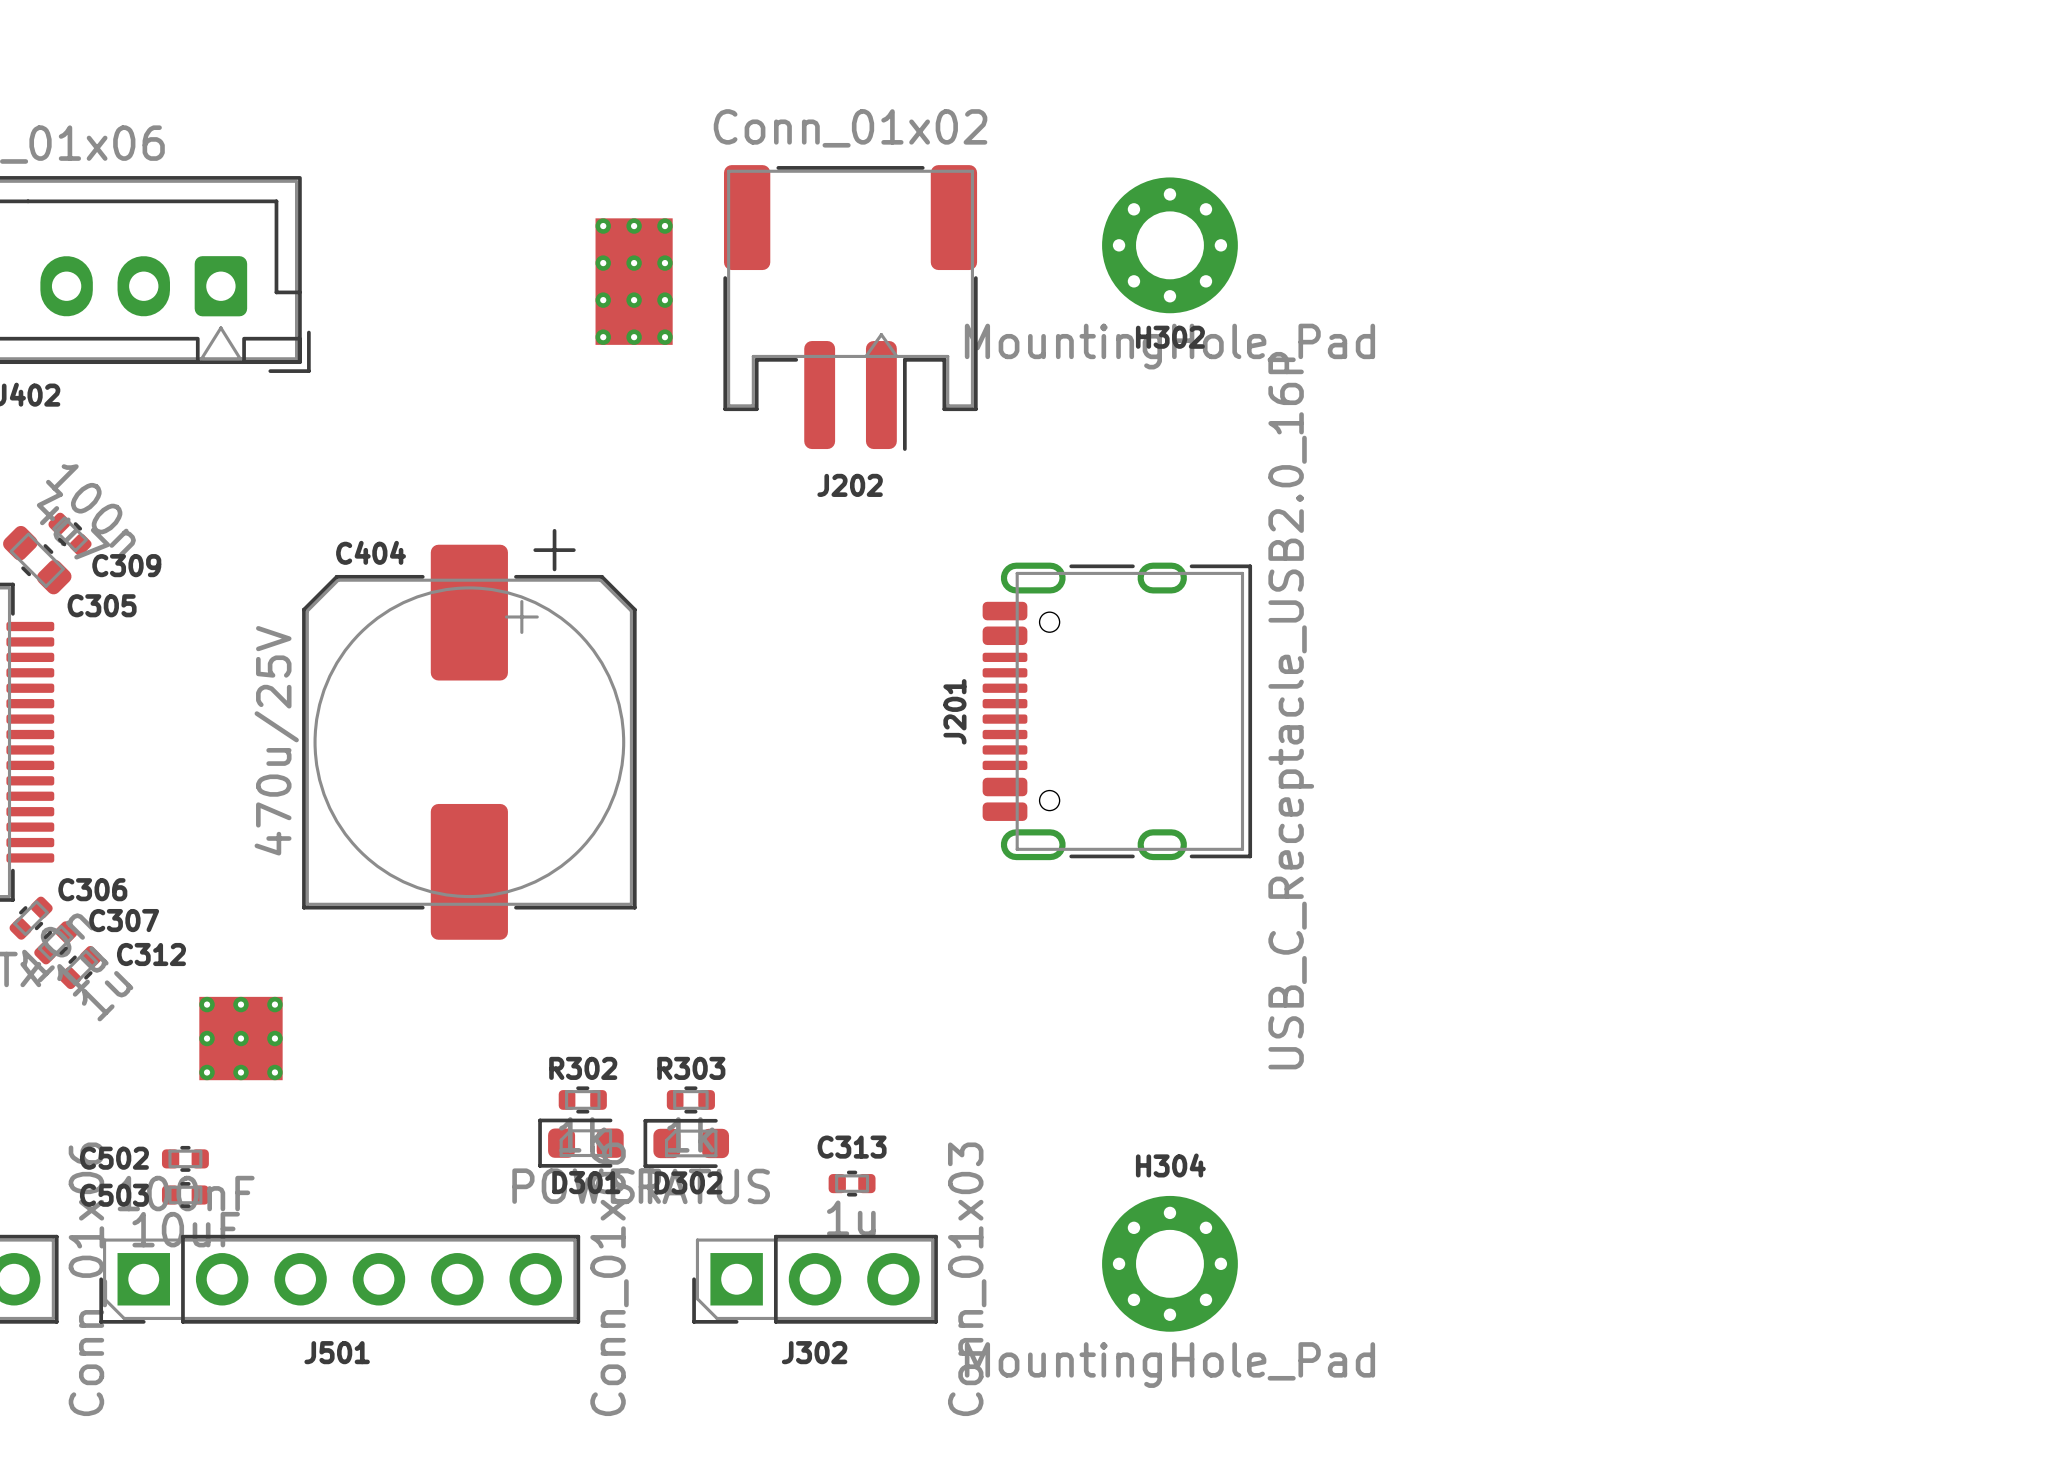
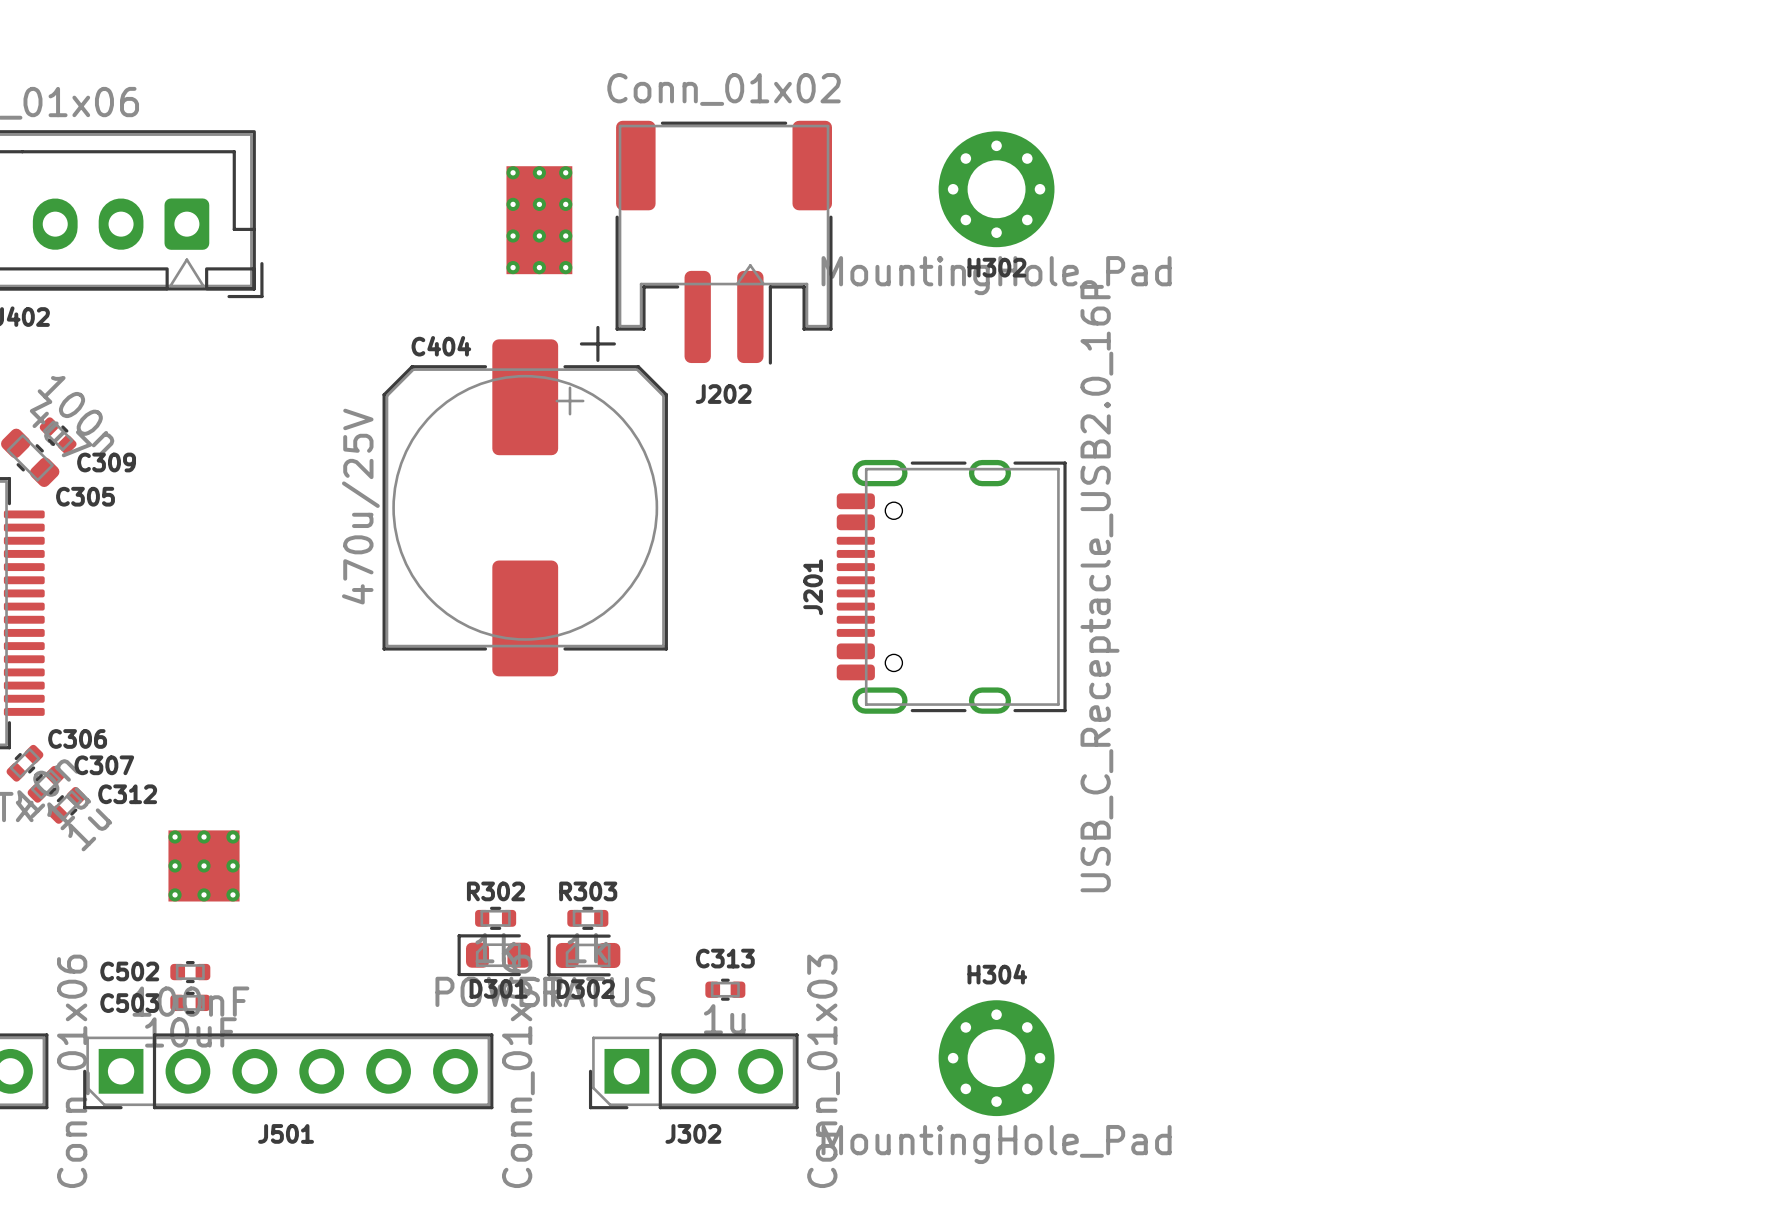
C404 position: (469, 734) -> (525, 501)
C502 position: (185, 1158) -> (190, 972)
C503 position: (185, 1195) -> (190, 1002)

